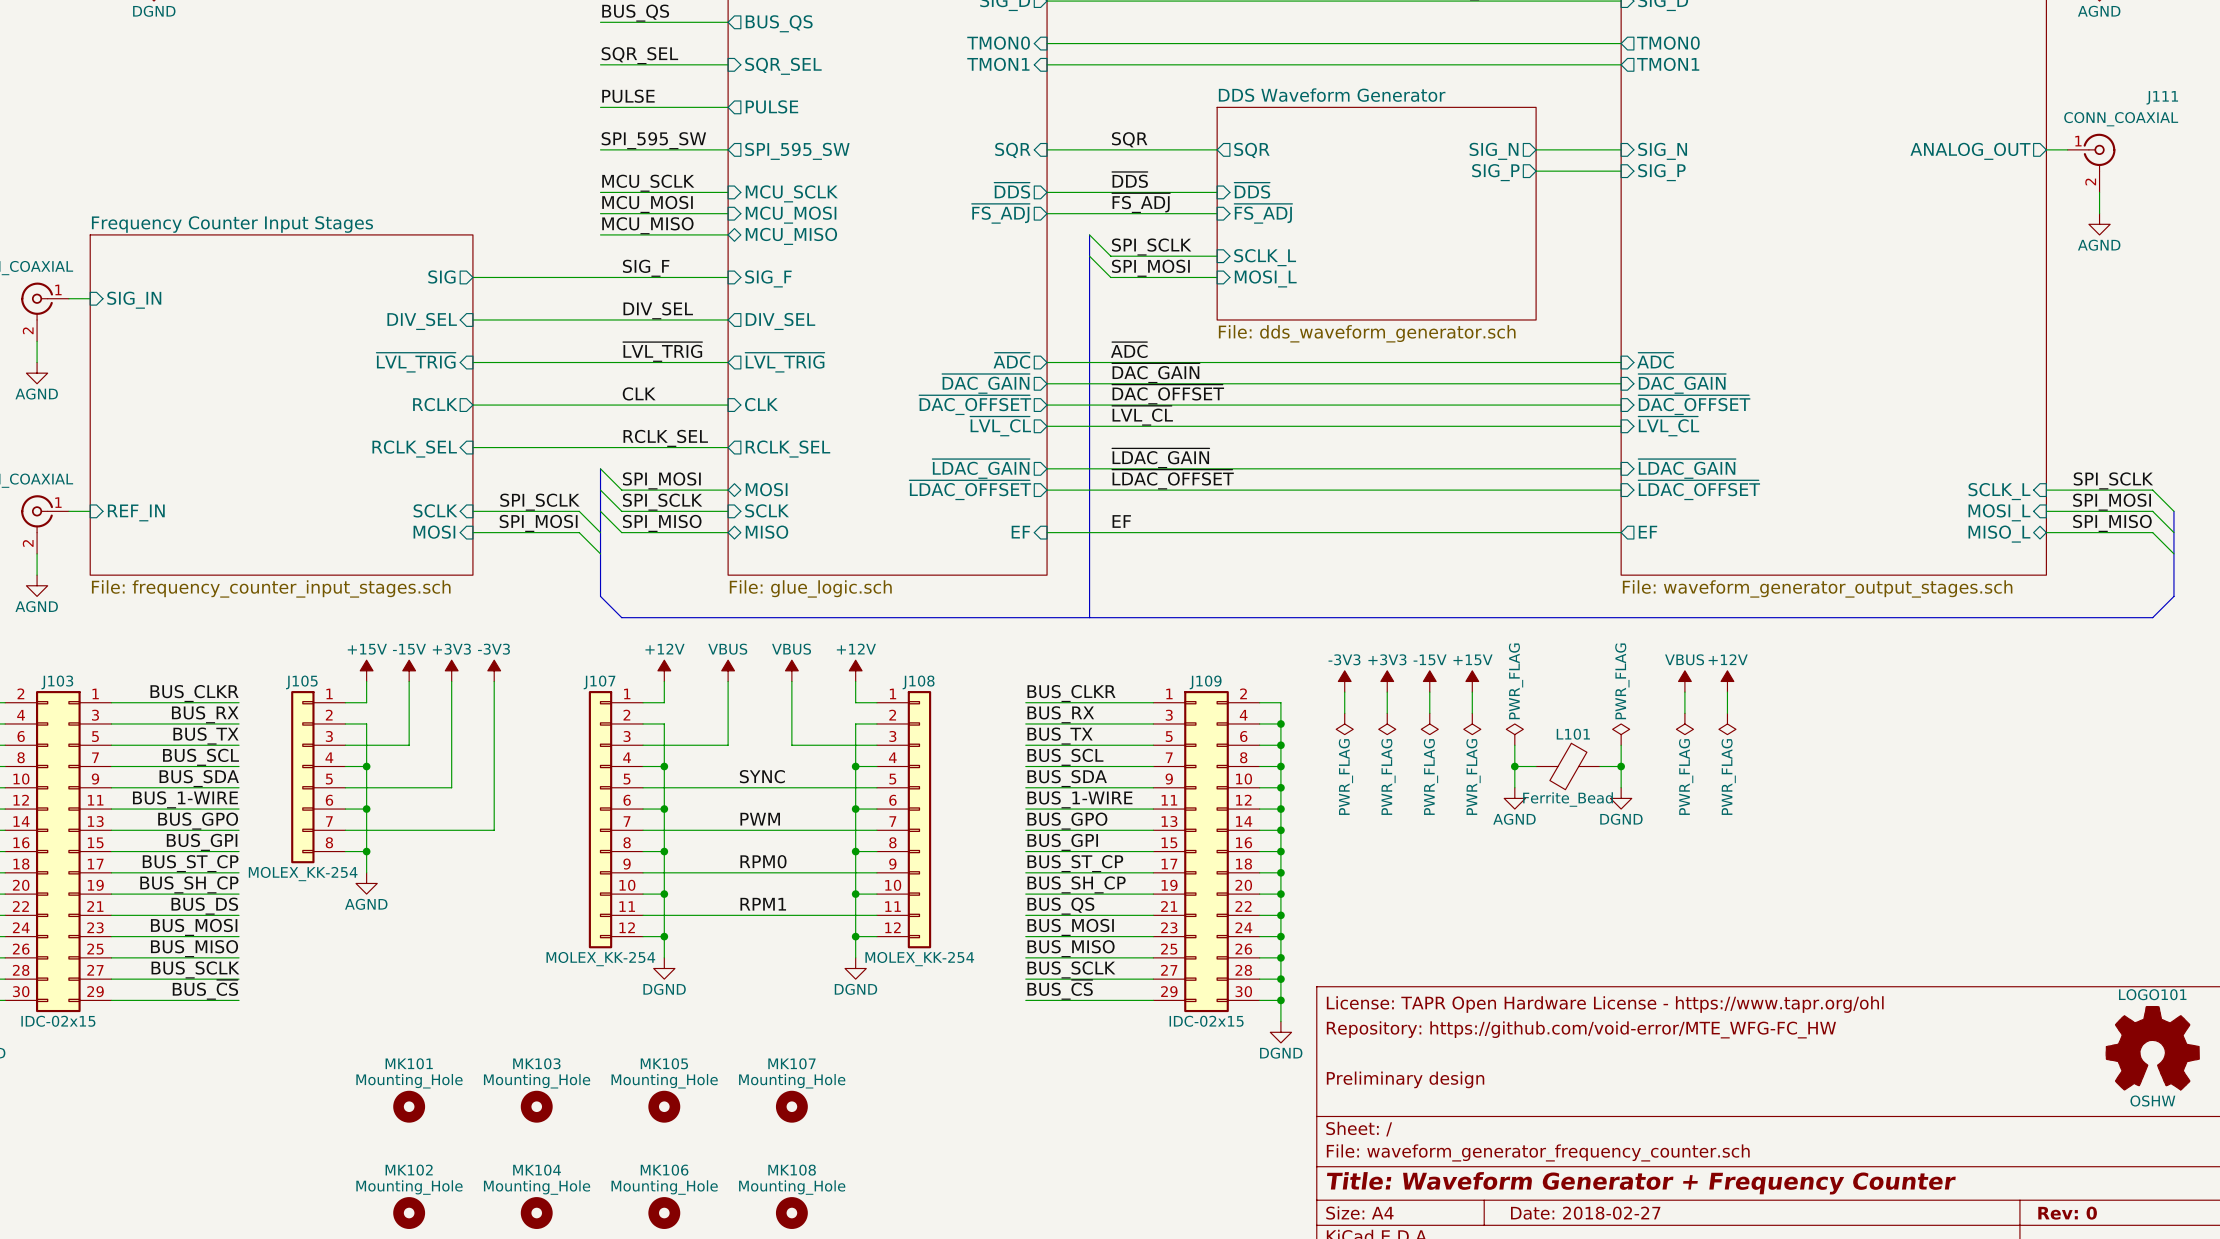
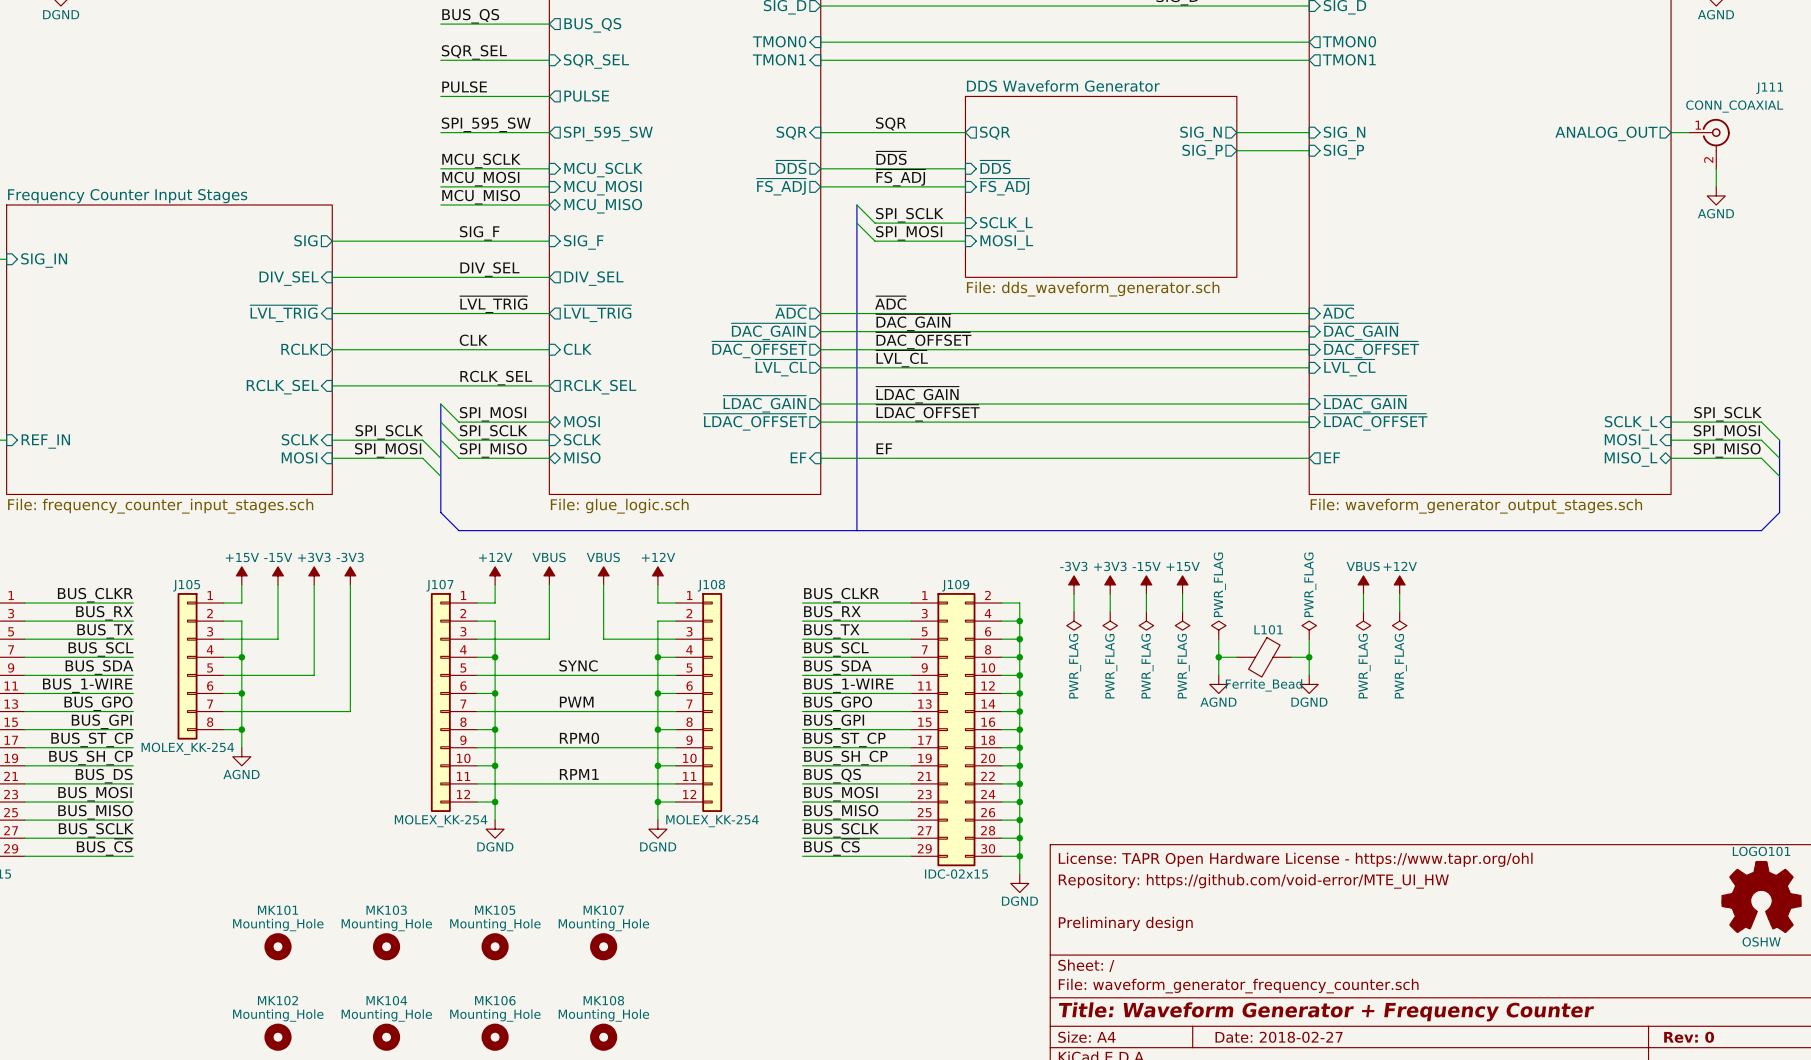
title block: Repository: https://github.com/void-error/MTE_WFG-FC_HW (1581, 1029) -> Repository: https://github.com/void-error/MTE_UI_HW (1253, 881)

